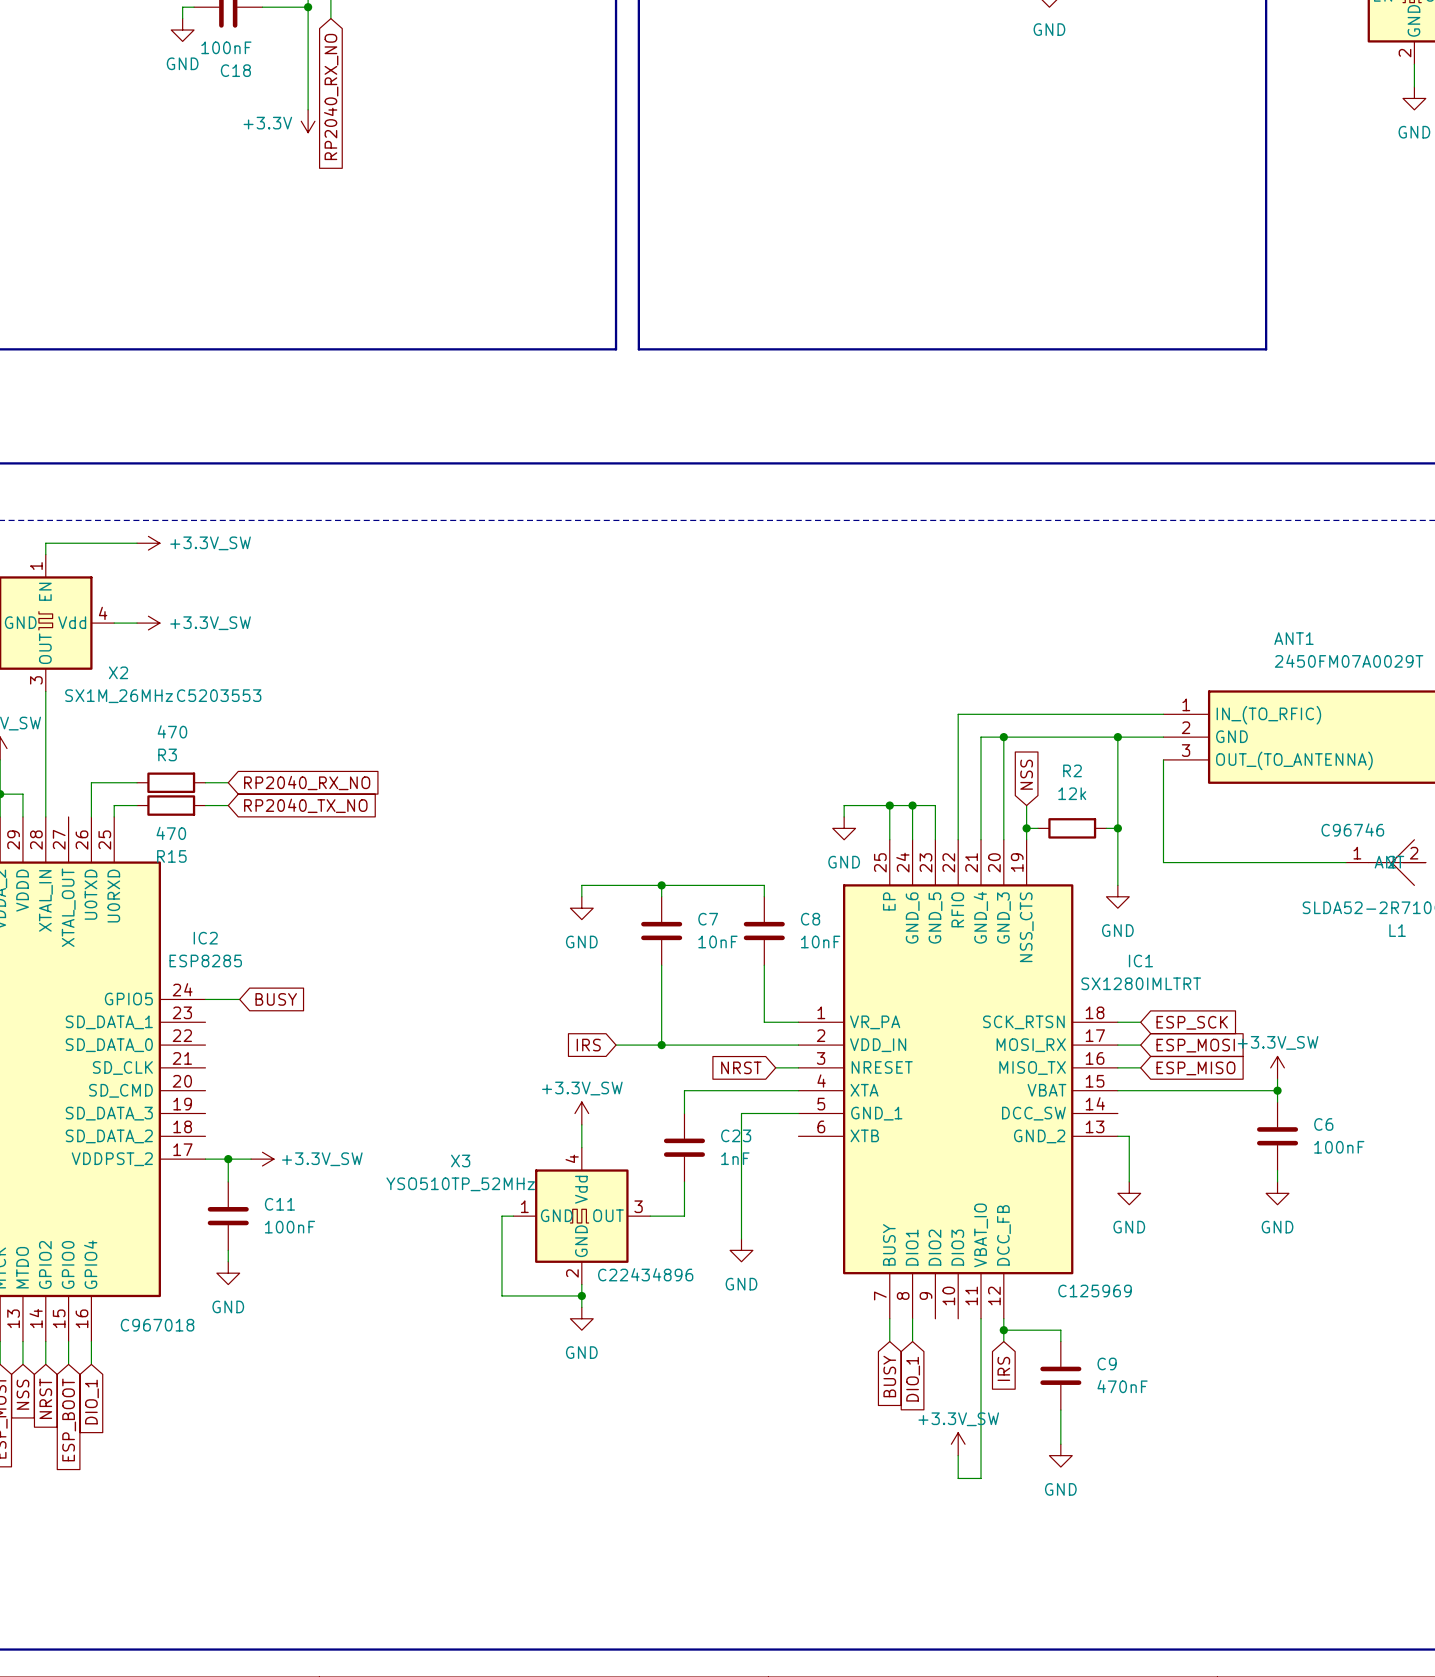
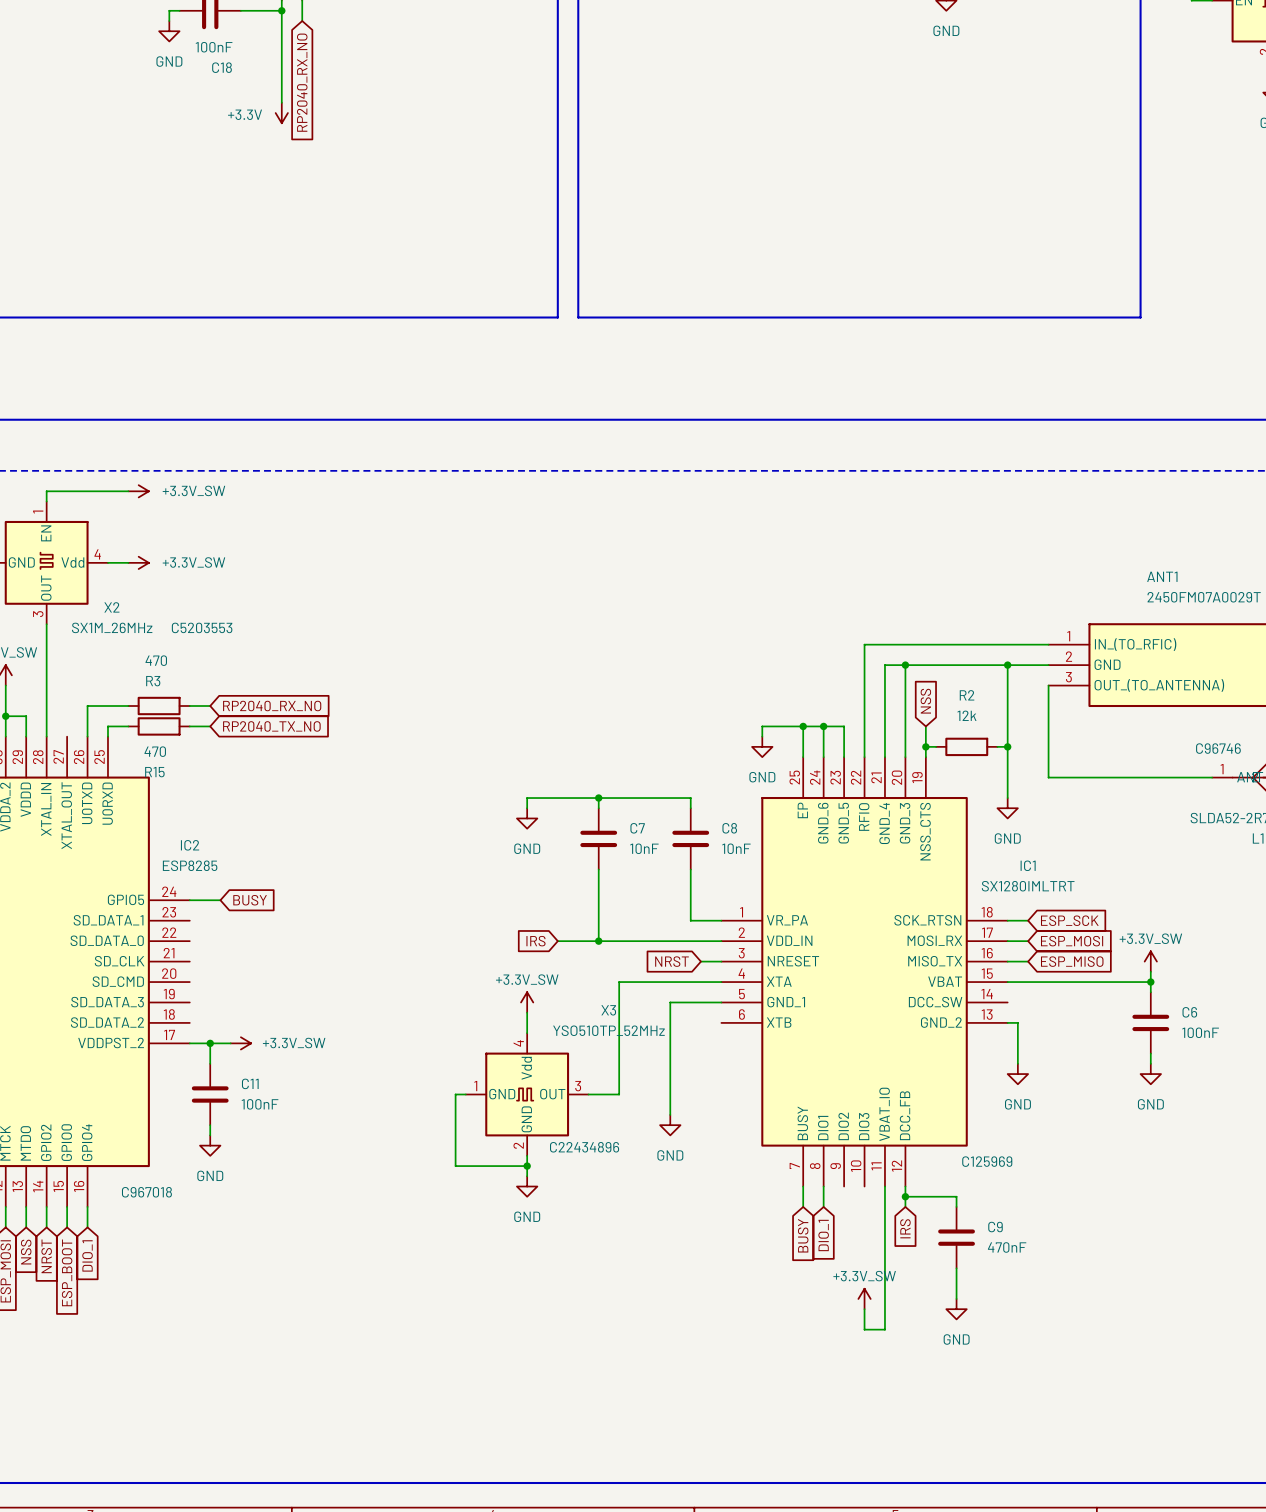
C23: 1nF (684, 1147) -> none
X3 name position: X3 (460, 1160) -> X3 (608, 1010)
X3 value position: YSO510TP_52MHz (460, 1184) -> YSO510TP_52MHz (608, 1030)

